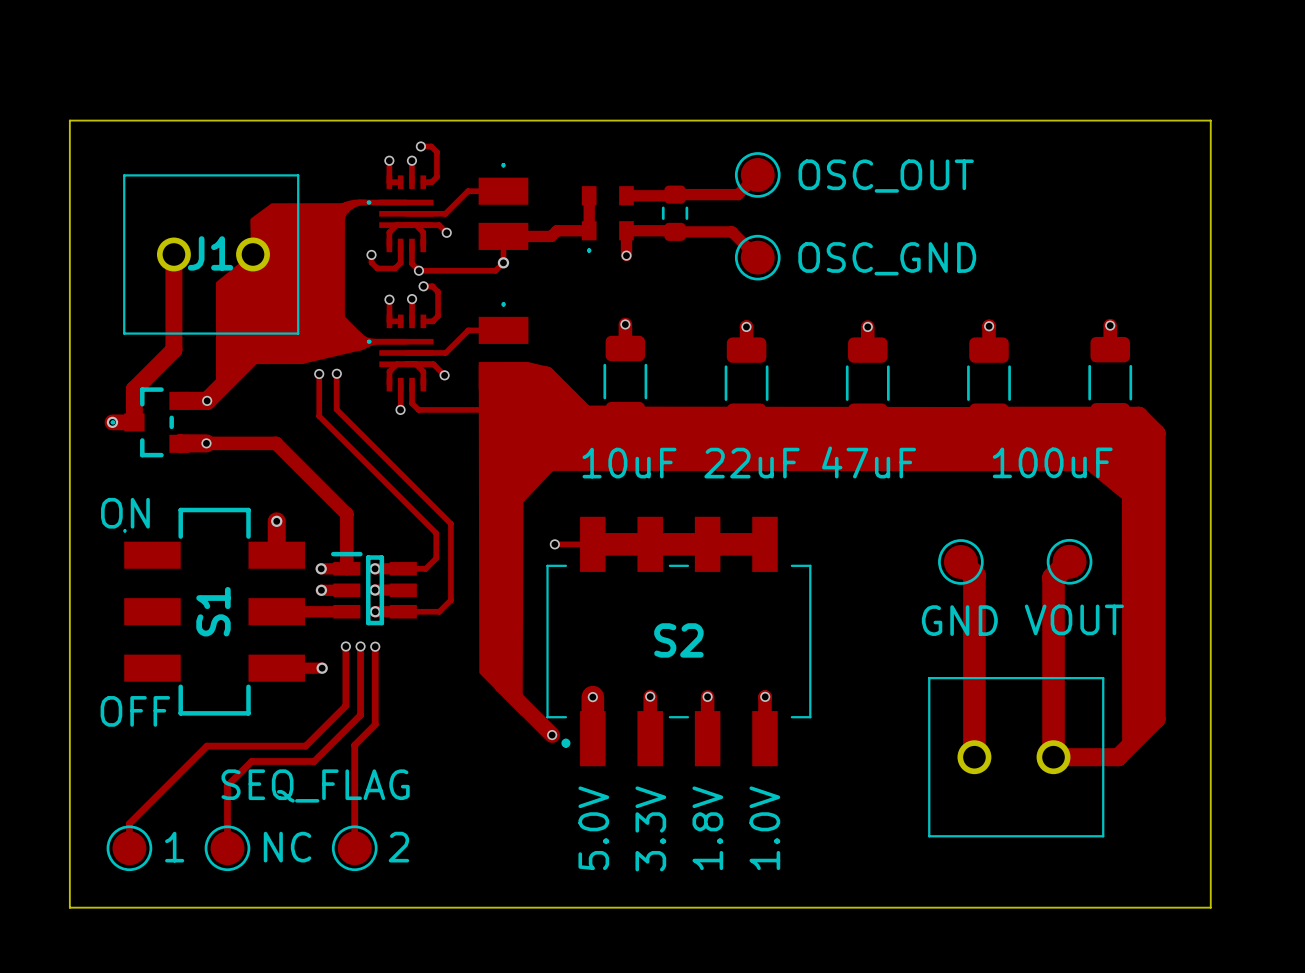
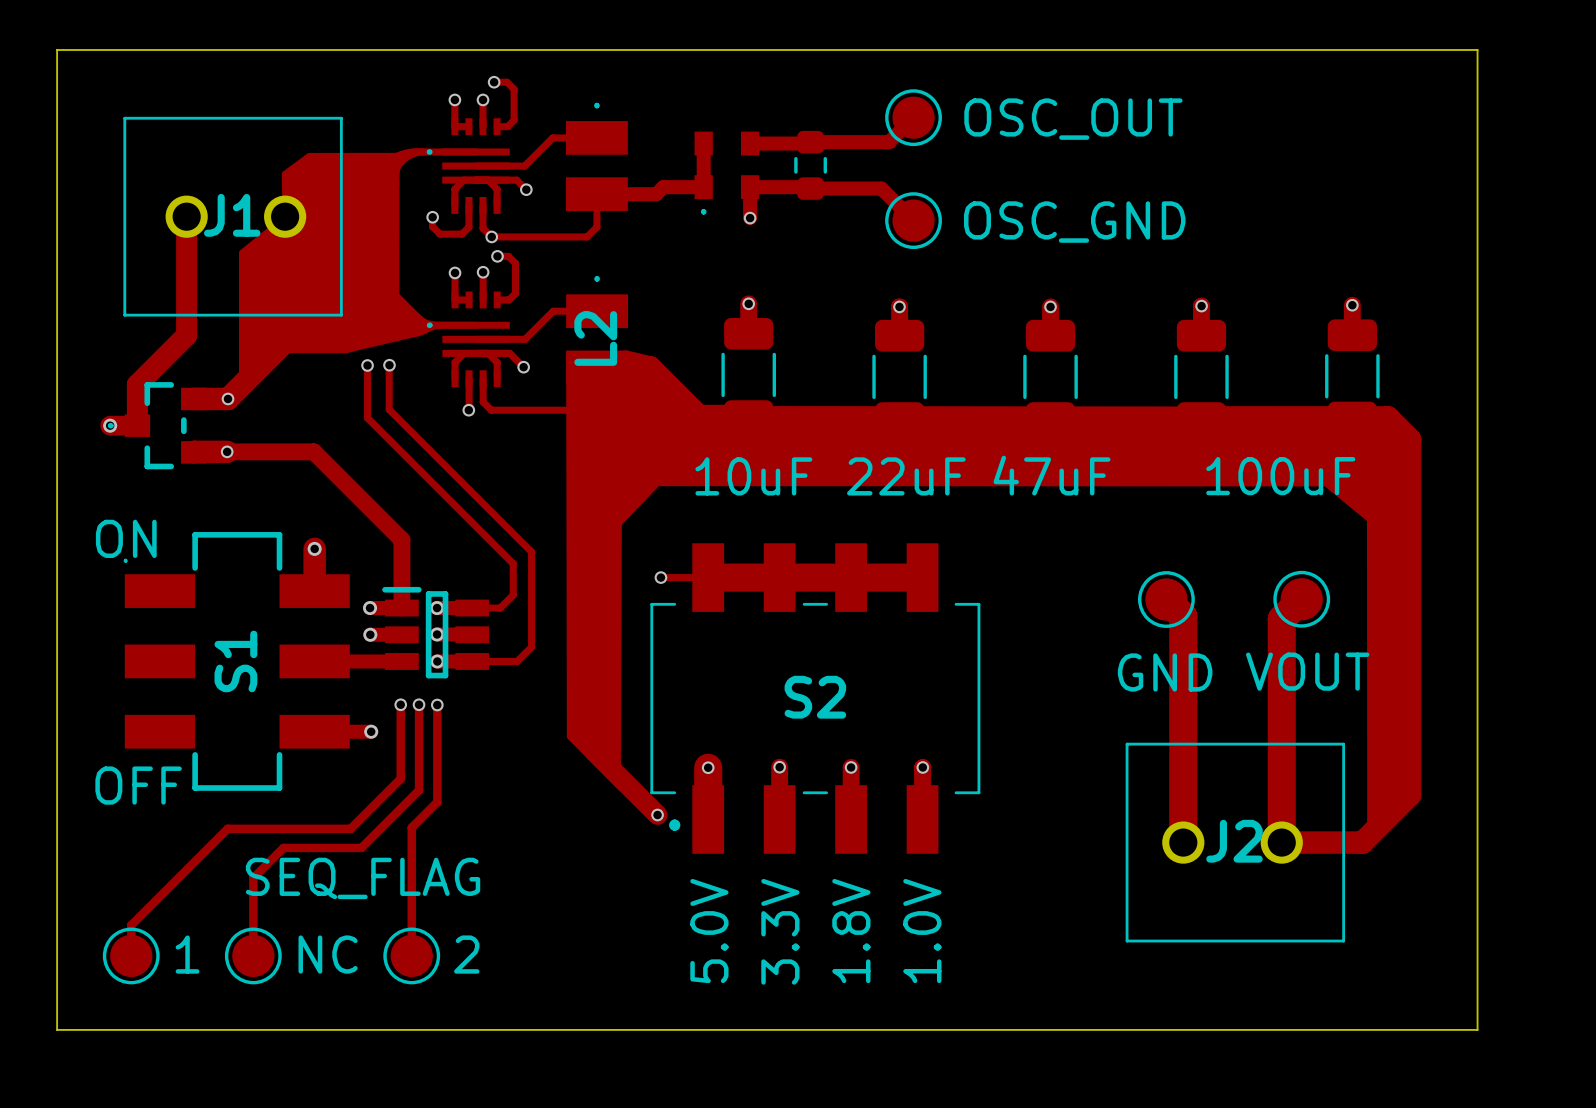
via: (503, 262) -> none
L2 name: none -> L2 (595, 338)
J2 name: none -> J2 (1234, 841)

